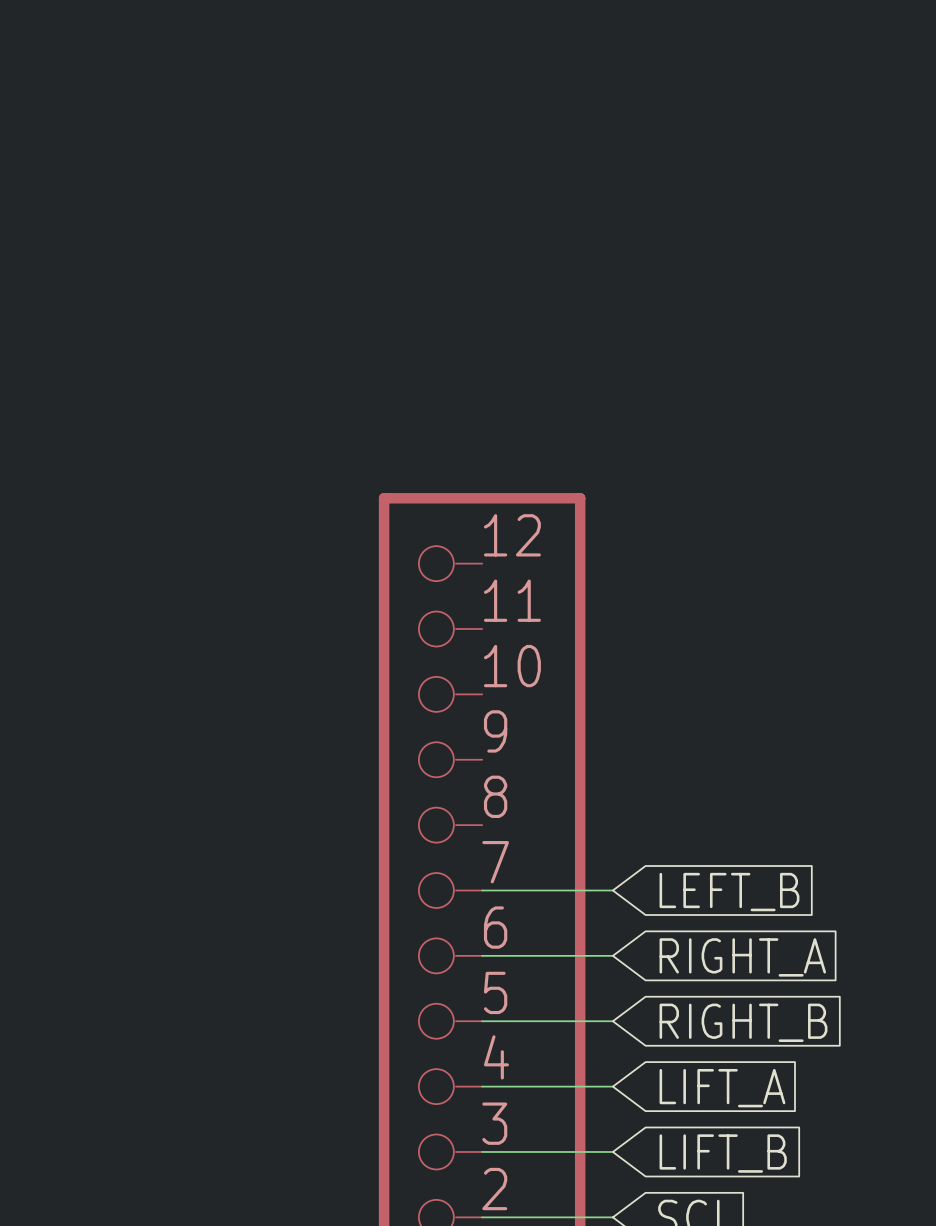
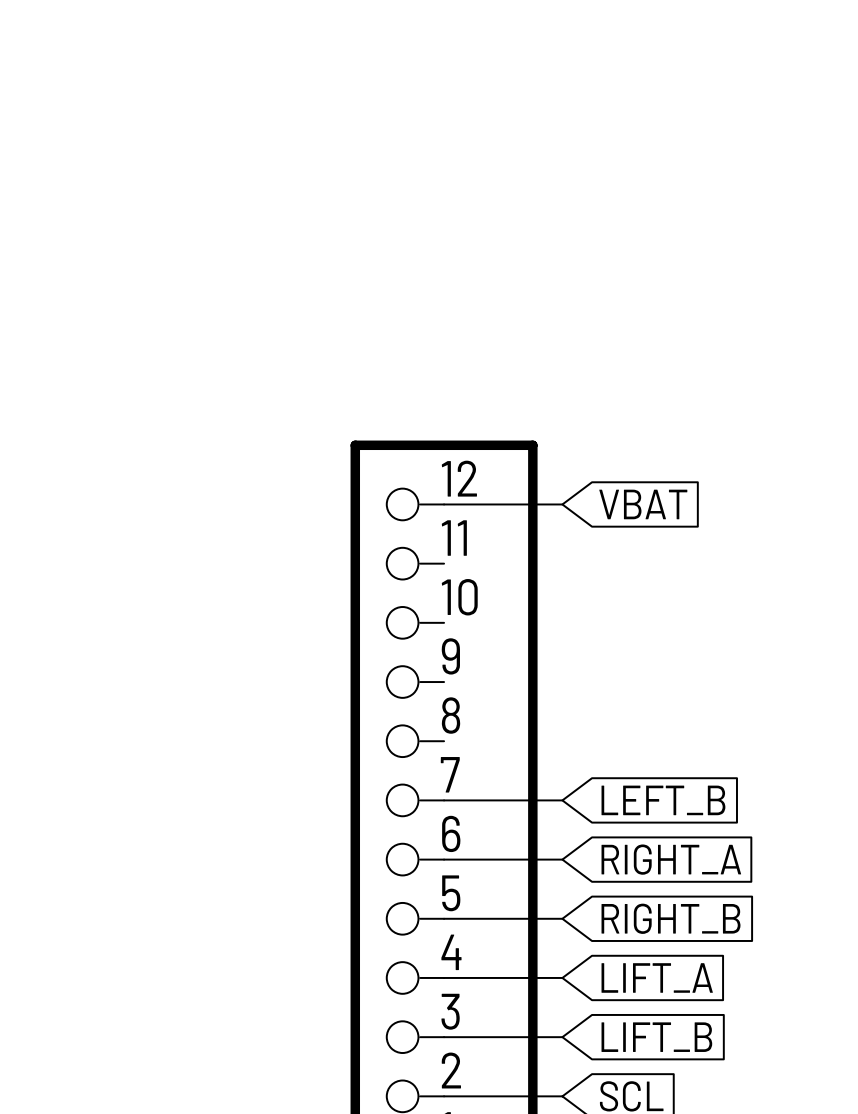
wire: none -> (444, 504) (562, 504)
global label: none -> VBAT (643, 504)

